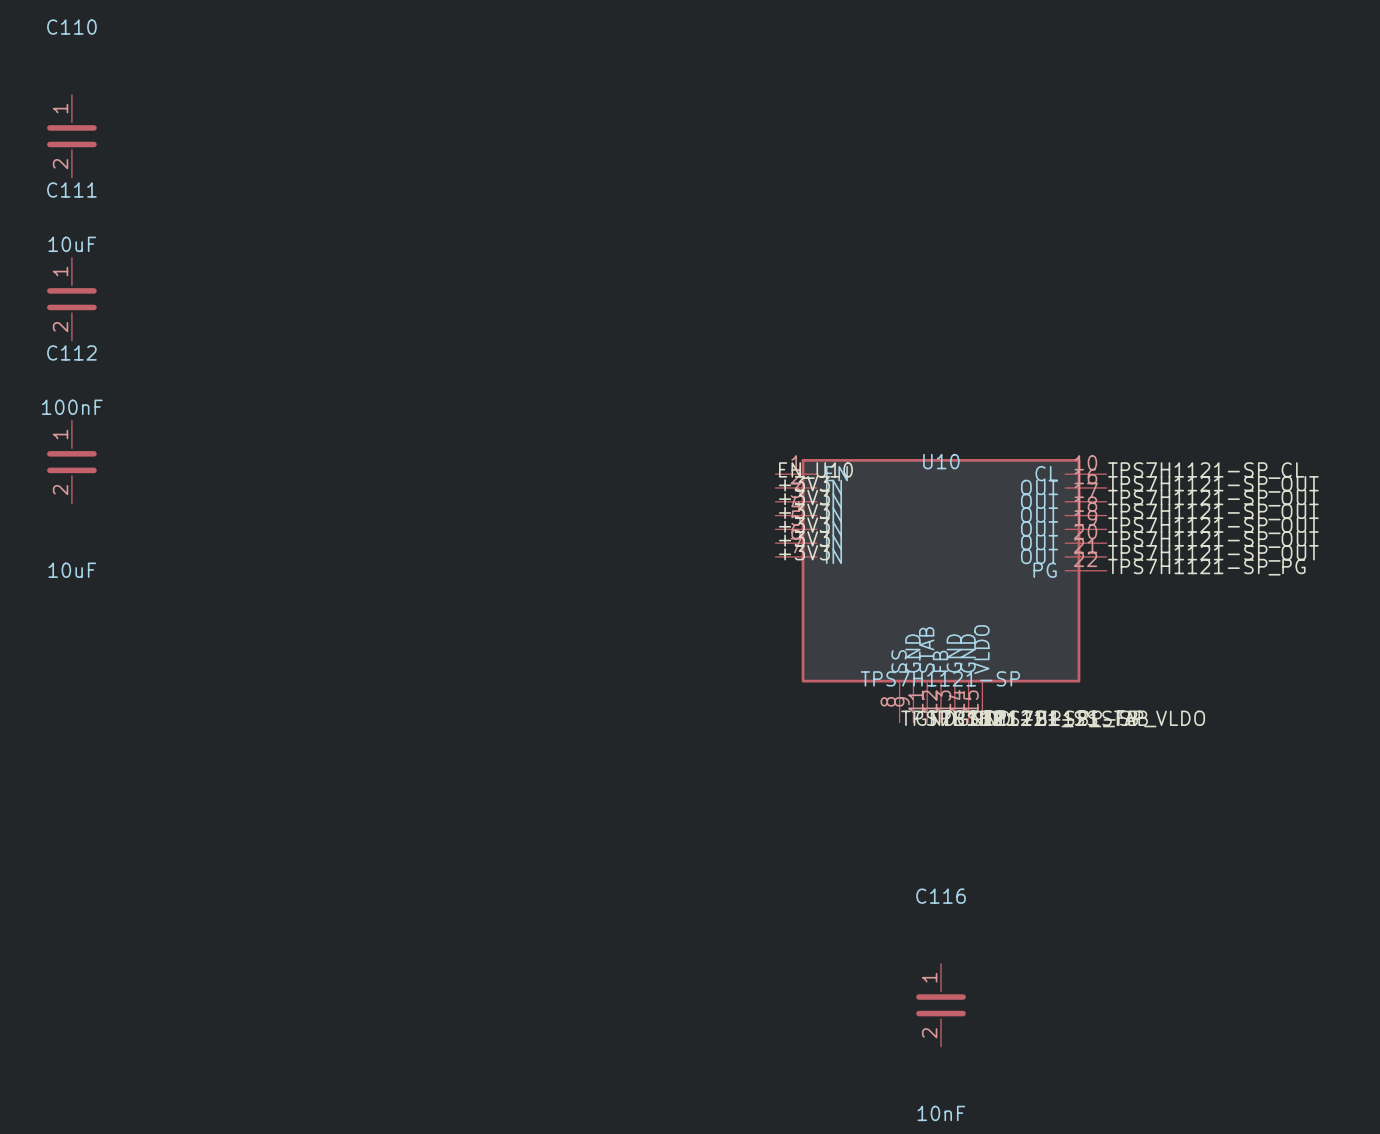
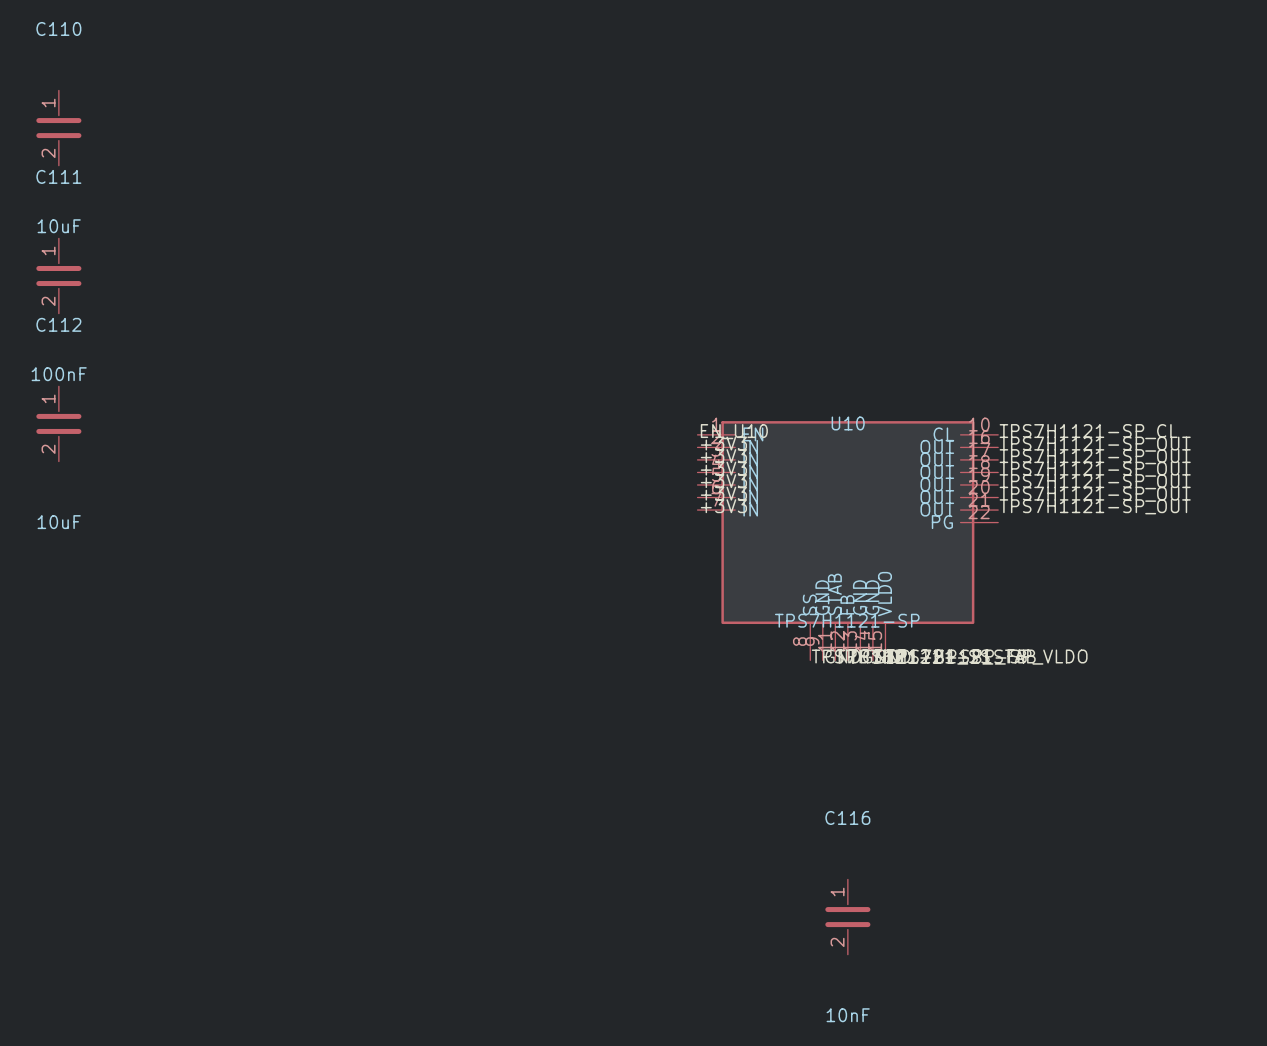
label: TPS7H1121-SP_PG (1206, 567) -> none

